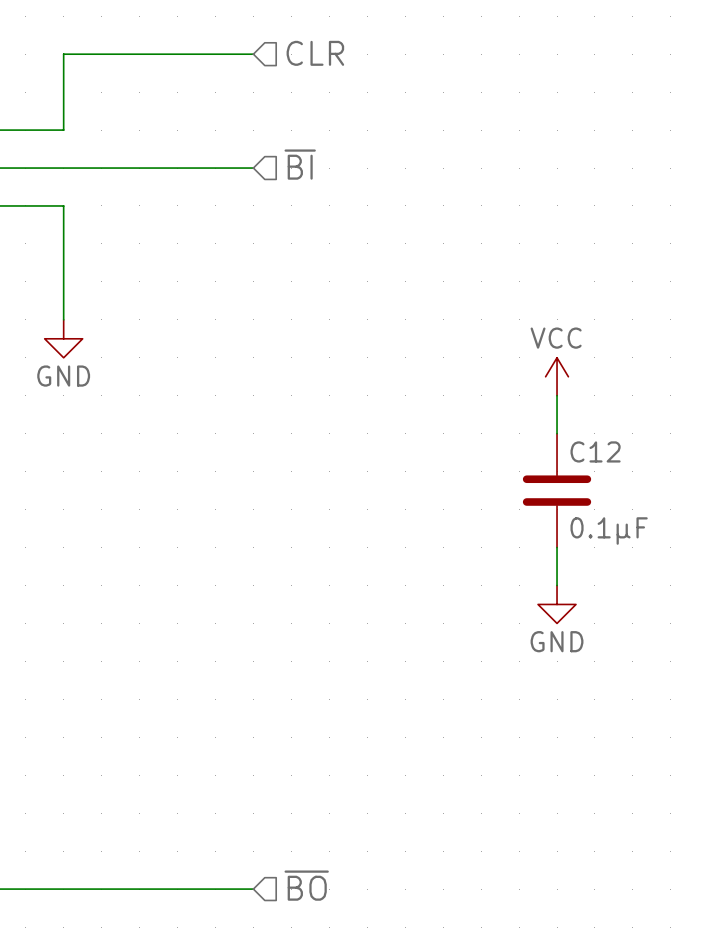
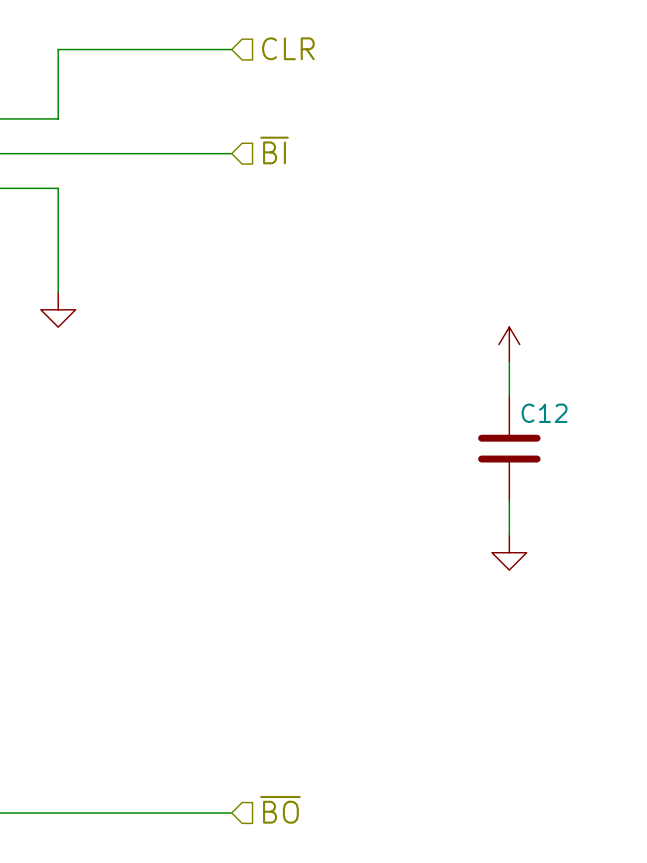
power symbol text: VCC (556, 338) -> none
power symbol text: GND (63, 376) -> none
C12 value: 0.1µF (609, 531) -> none
power symbol text: GND (557, 641) -> none

